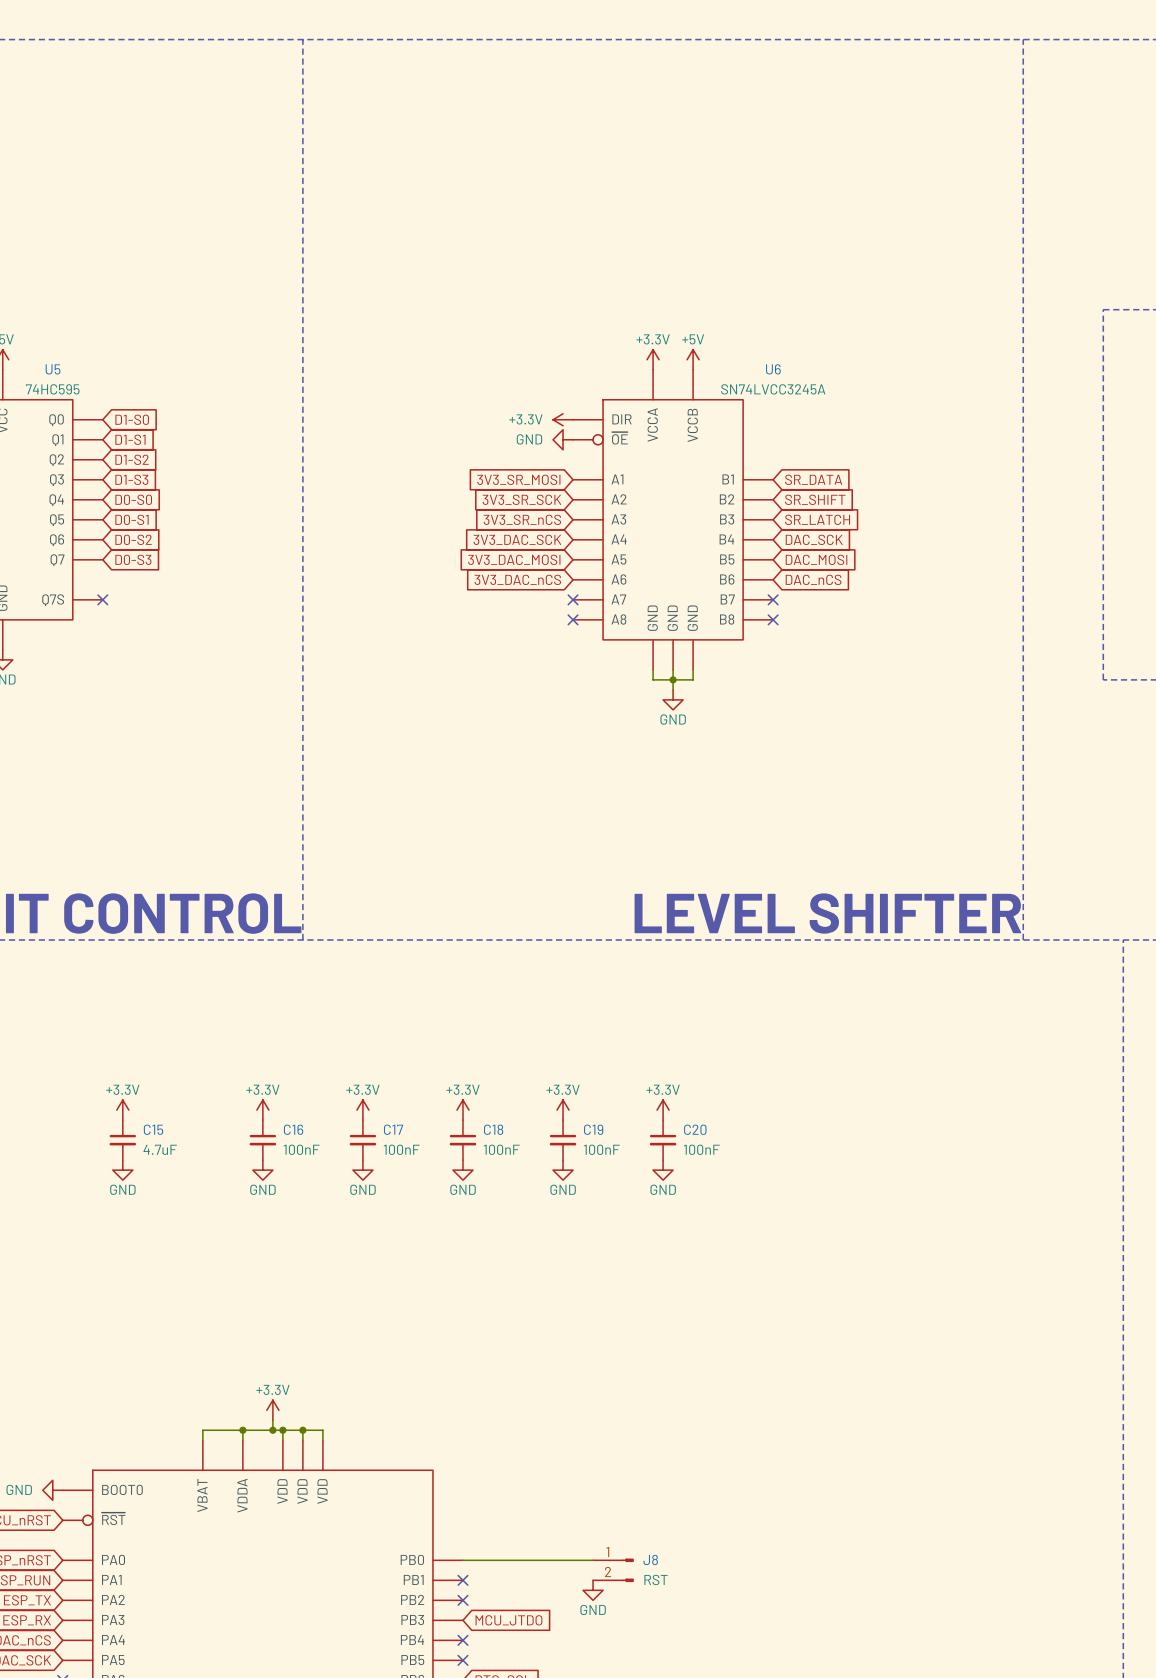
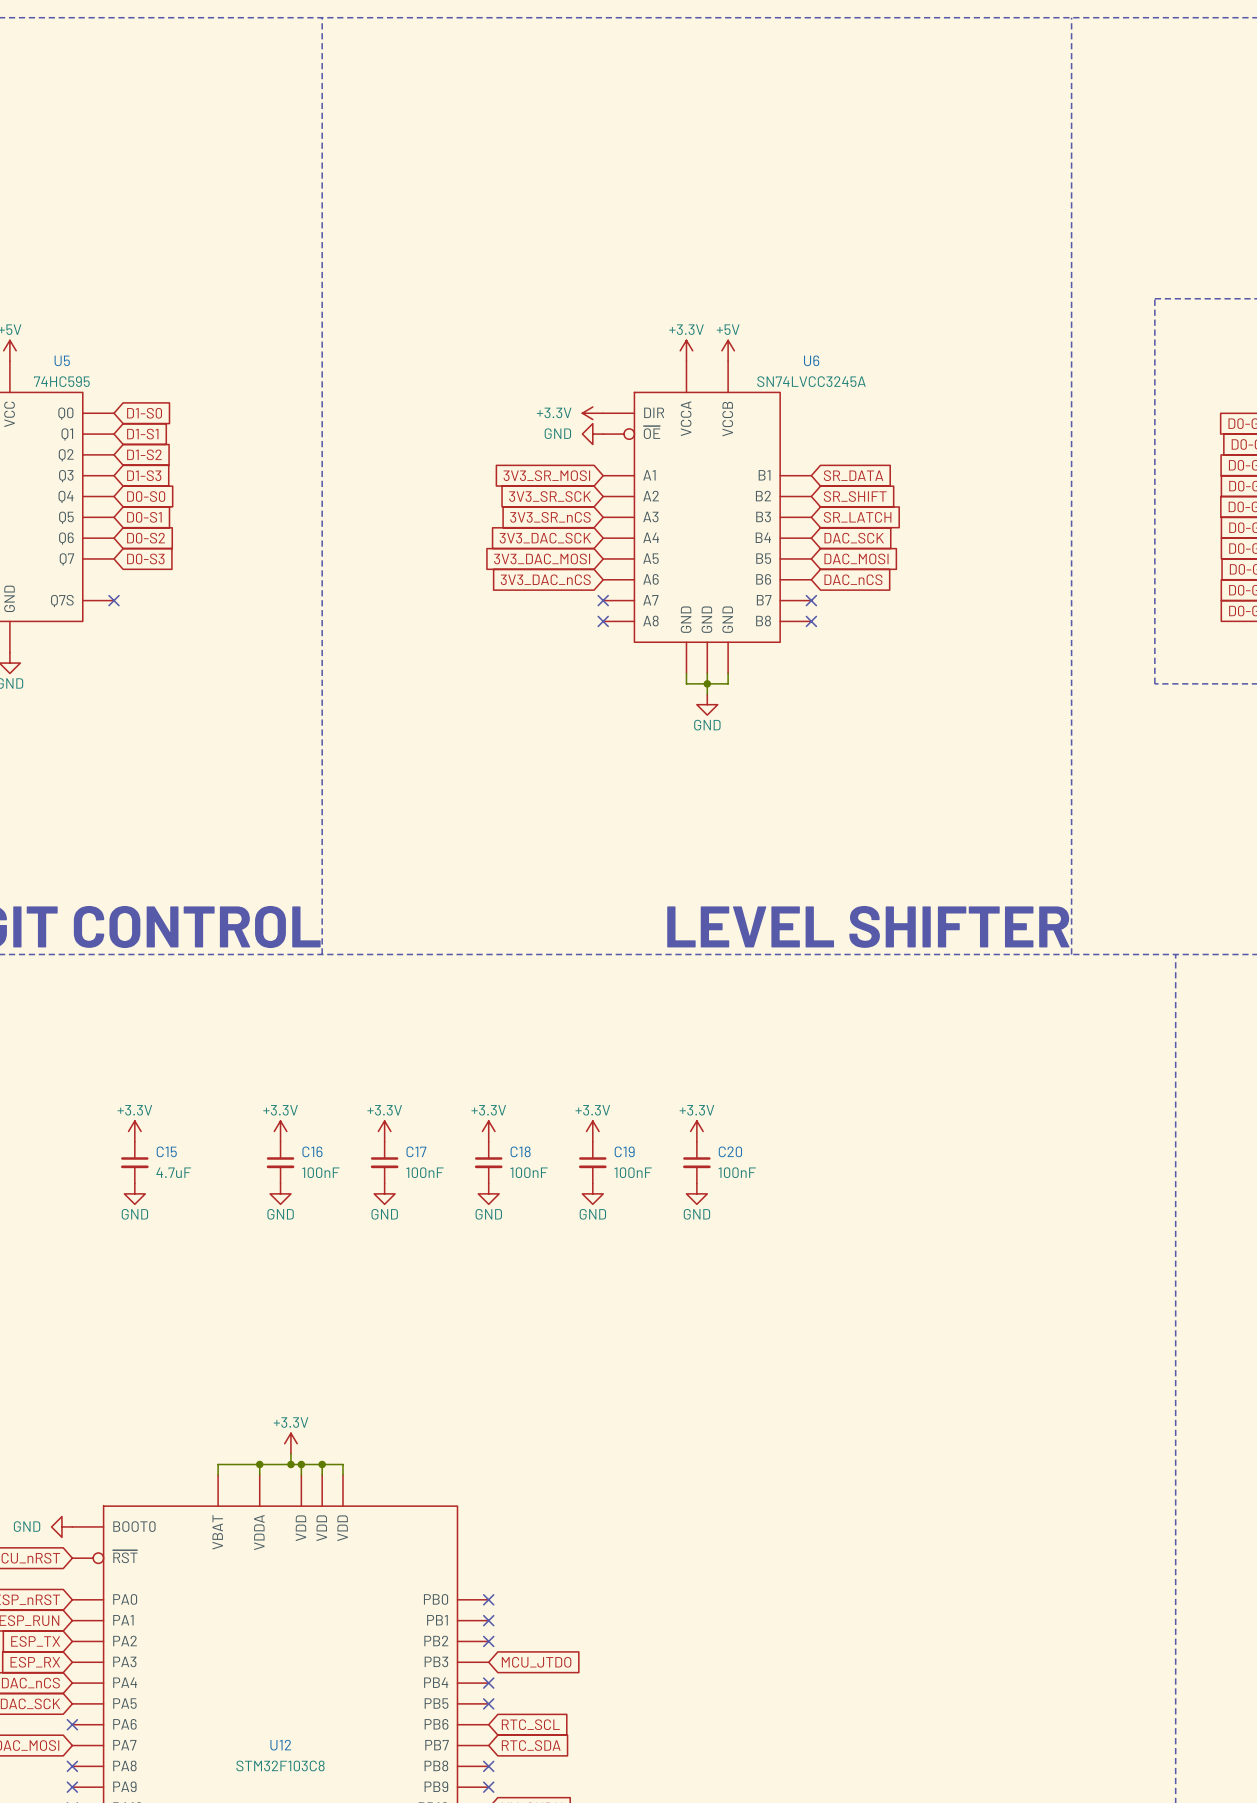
wire: (462, 1560) (593, 1560) -> none
no-connect mark: none -> (488, 1599)
J8: RST (613, 1570) -> none
power symbol: GND (593, 1590) -> none

